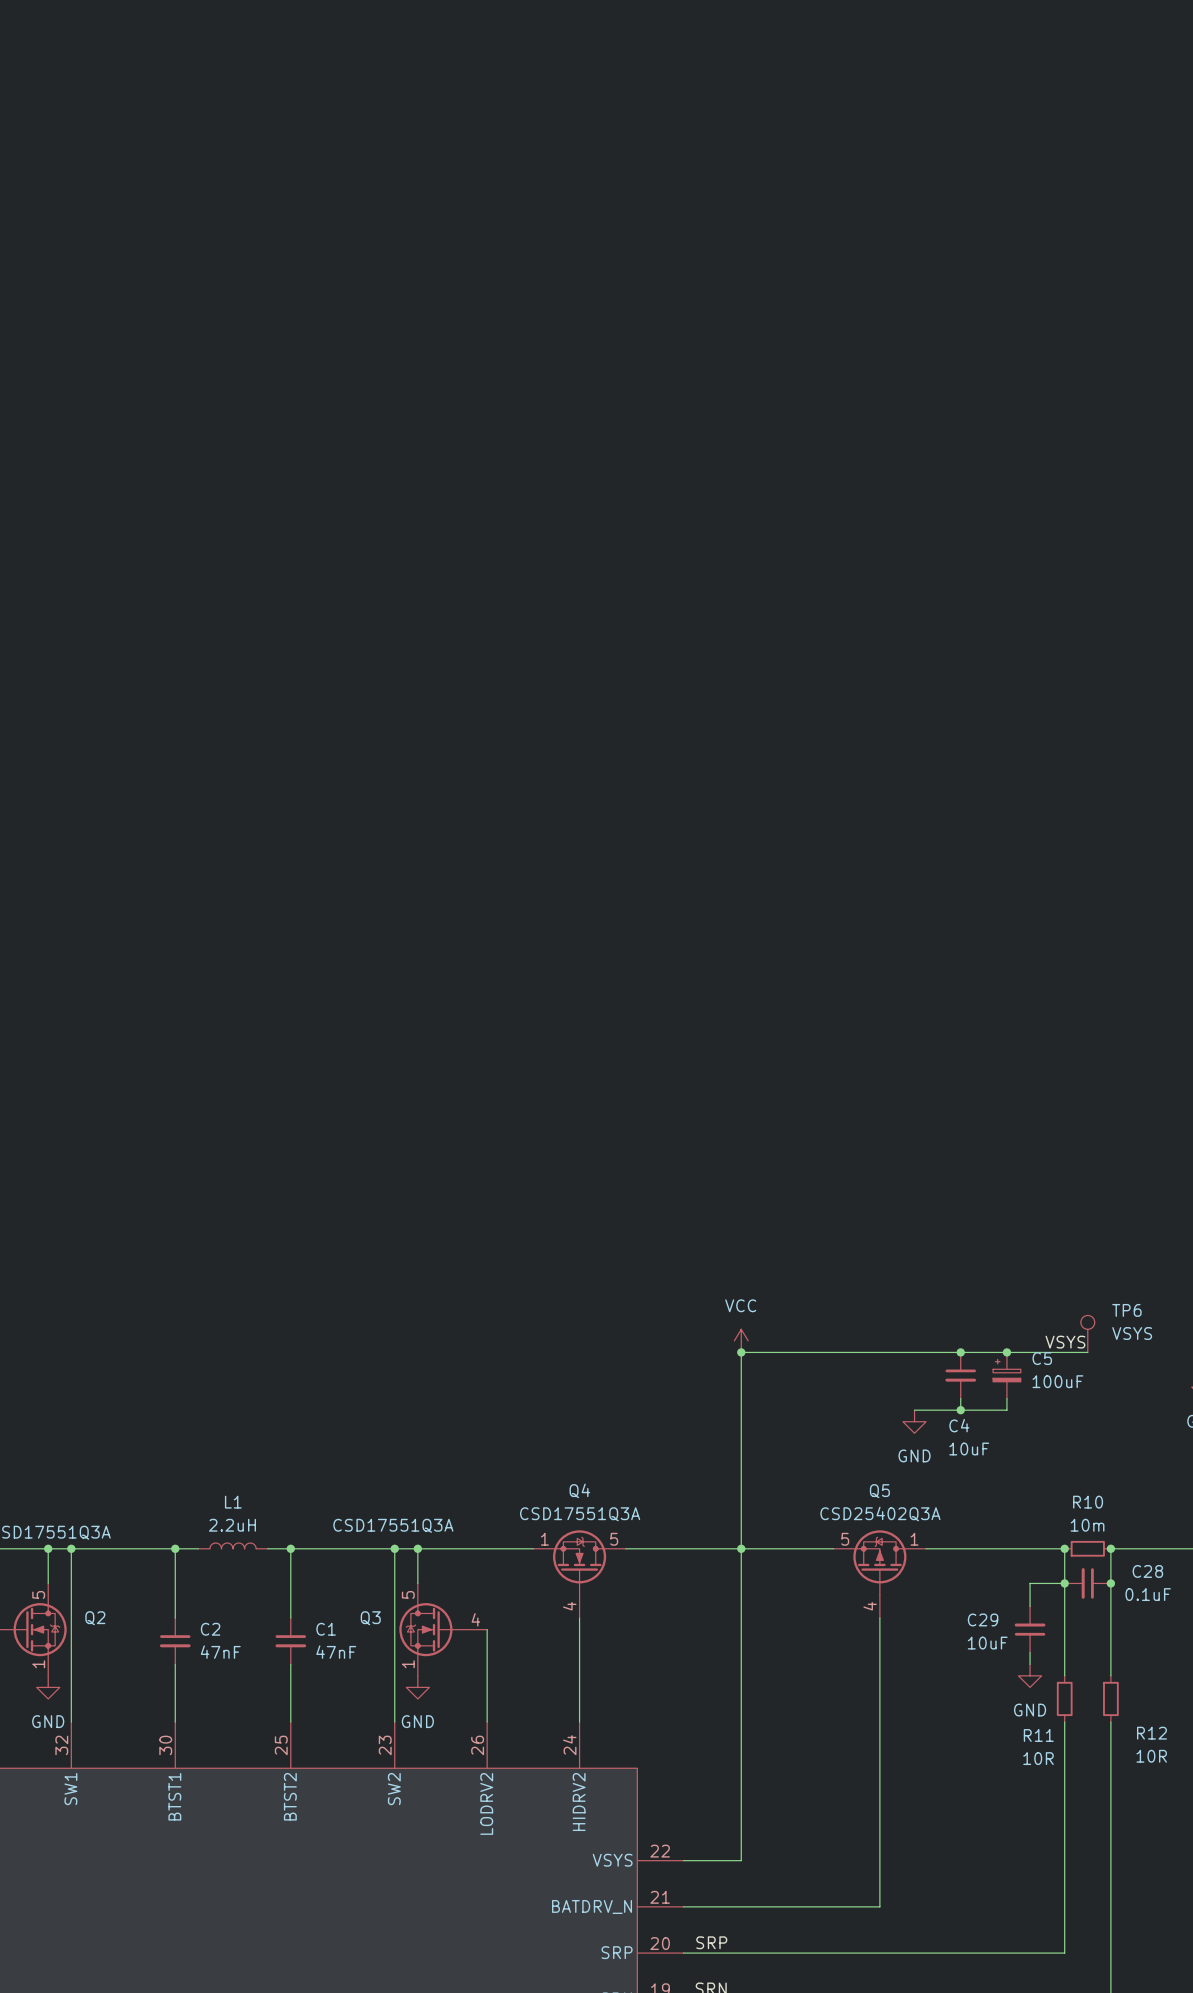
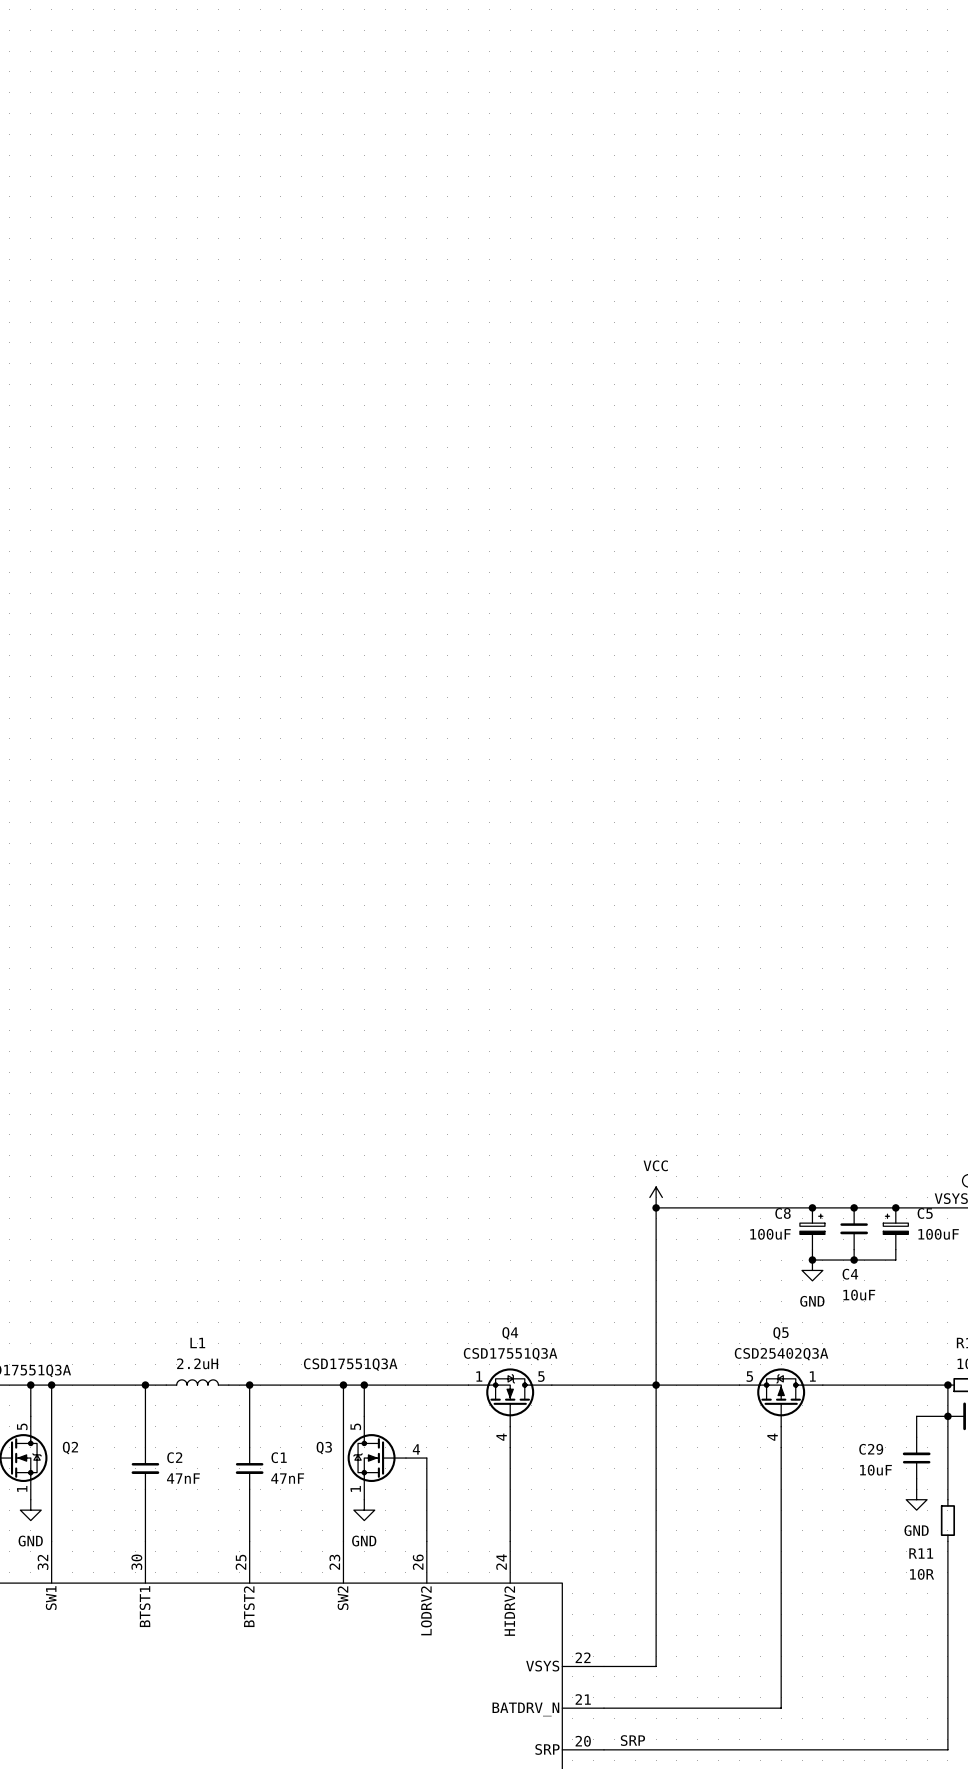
junction: none -> (812, 1207)
C8: none -> 100uF (812, 1228)
wire: none -> (812, 1249) (812, 1260)
junction: none -> (812, 1260)

